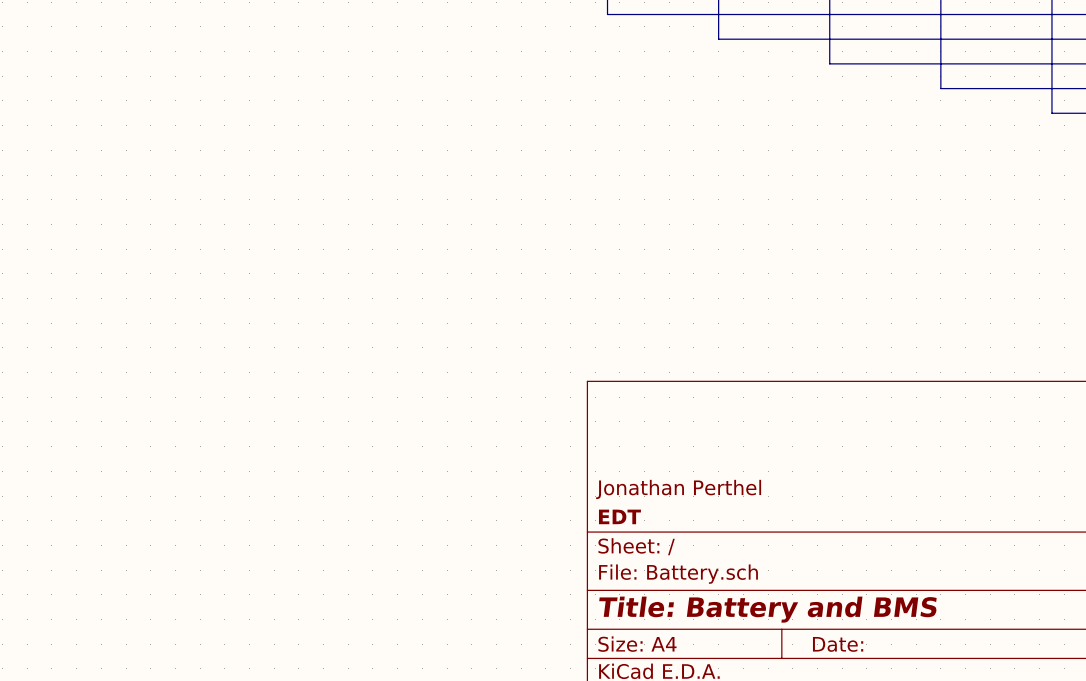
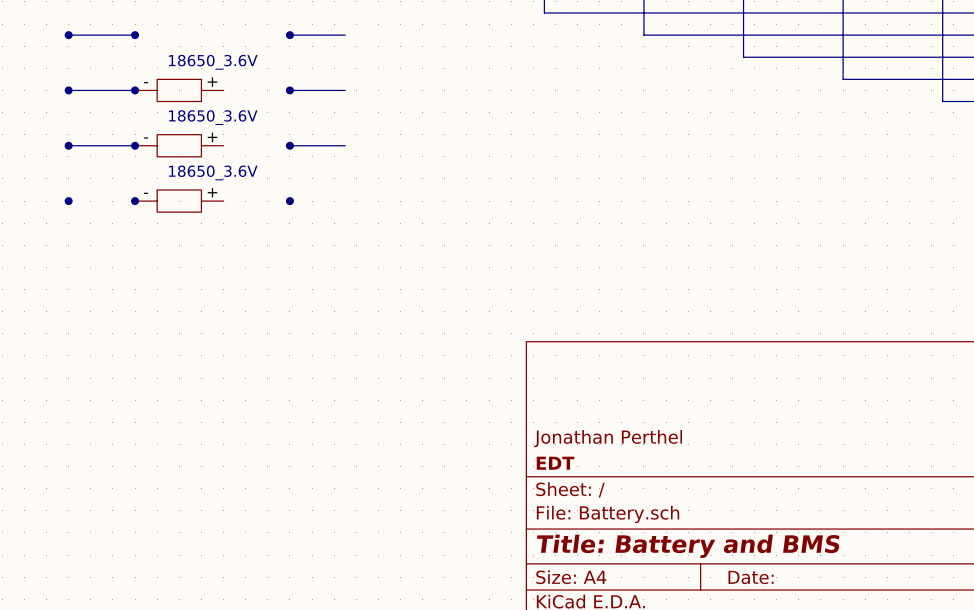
wire: none -> (68, 35) (135, 35)
junction: none -> (68, 35)
junction: none -> (135, 35)
wire: none -> (289, 35) (345, 35)
junction: none -> (289, 35)
wire: none -> (68, 90) (135, 90)
junction: none -> (68, 90)
junction: none -> (135, 90)
part: none -> 18650_3.6V (179, 90)
wire: none -> (289, 90) (345, 90)
junction: none -> (289, 90)
wire: none -> (68, 145) (135, 145)
junction: none -> (68, 145)
junction: none -> (135, 145)
part: none -> 18650_3.6V (179, 145)
wire: none -> (289, 145) (345, 145)
junction: none -> (289, 145)
junction: none -> (68, 201)
junction: none -> (135, 201)
part: none -> 18650_3.6V (179, 201)
junction: none -> (289, 201)

